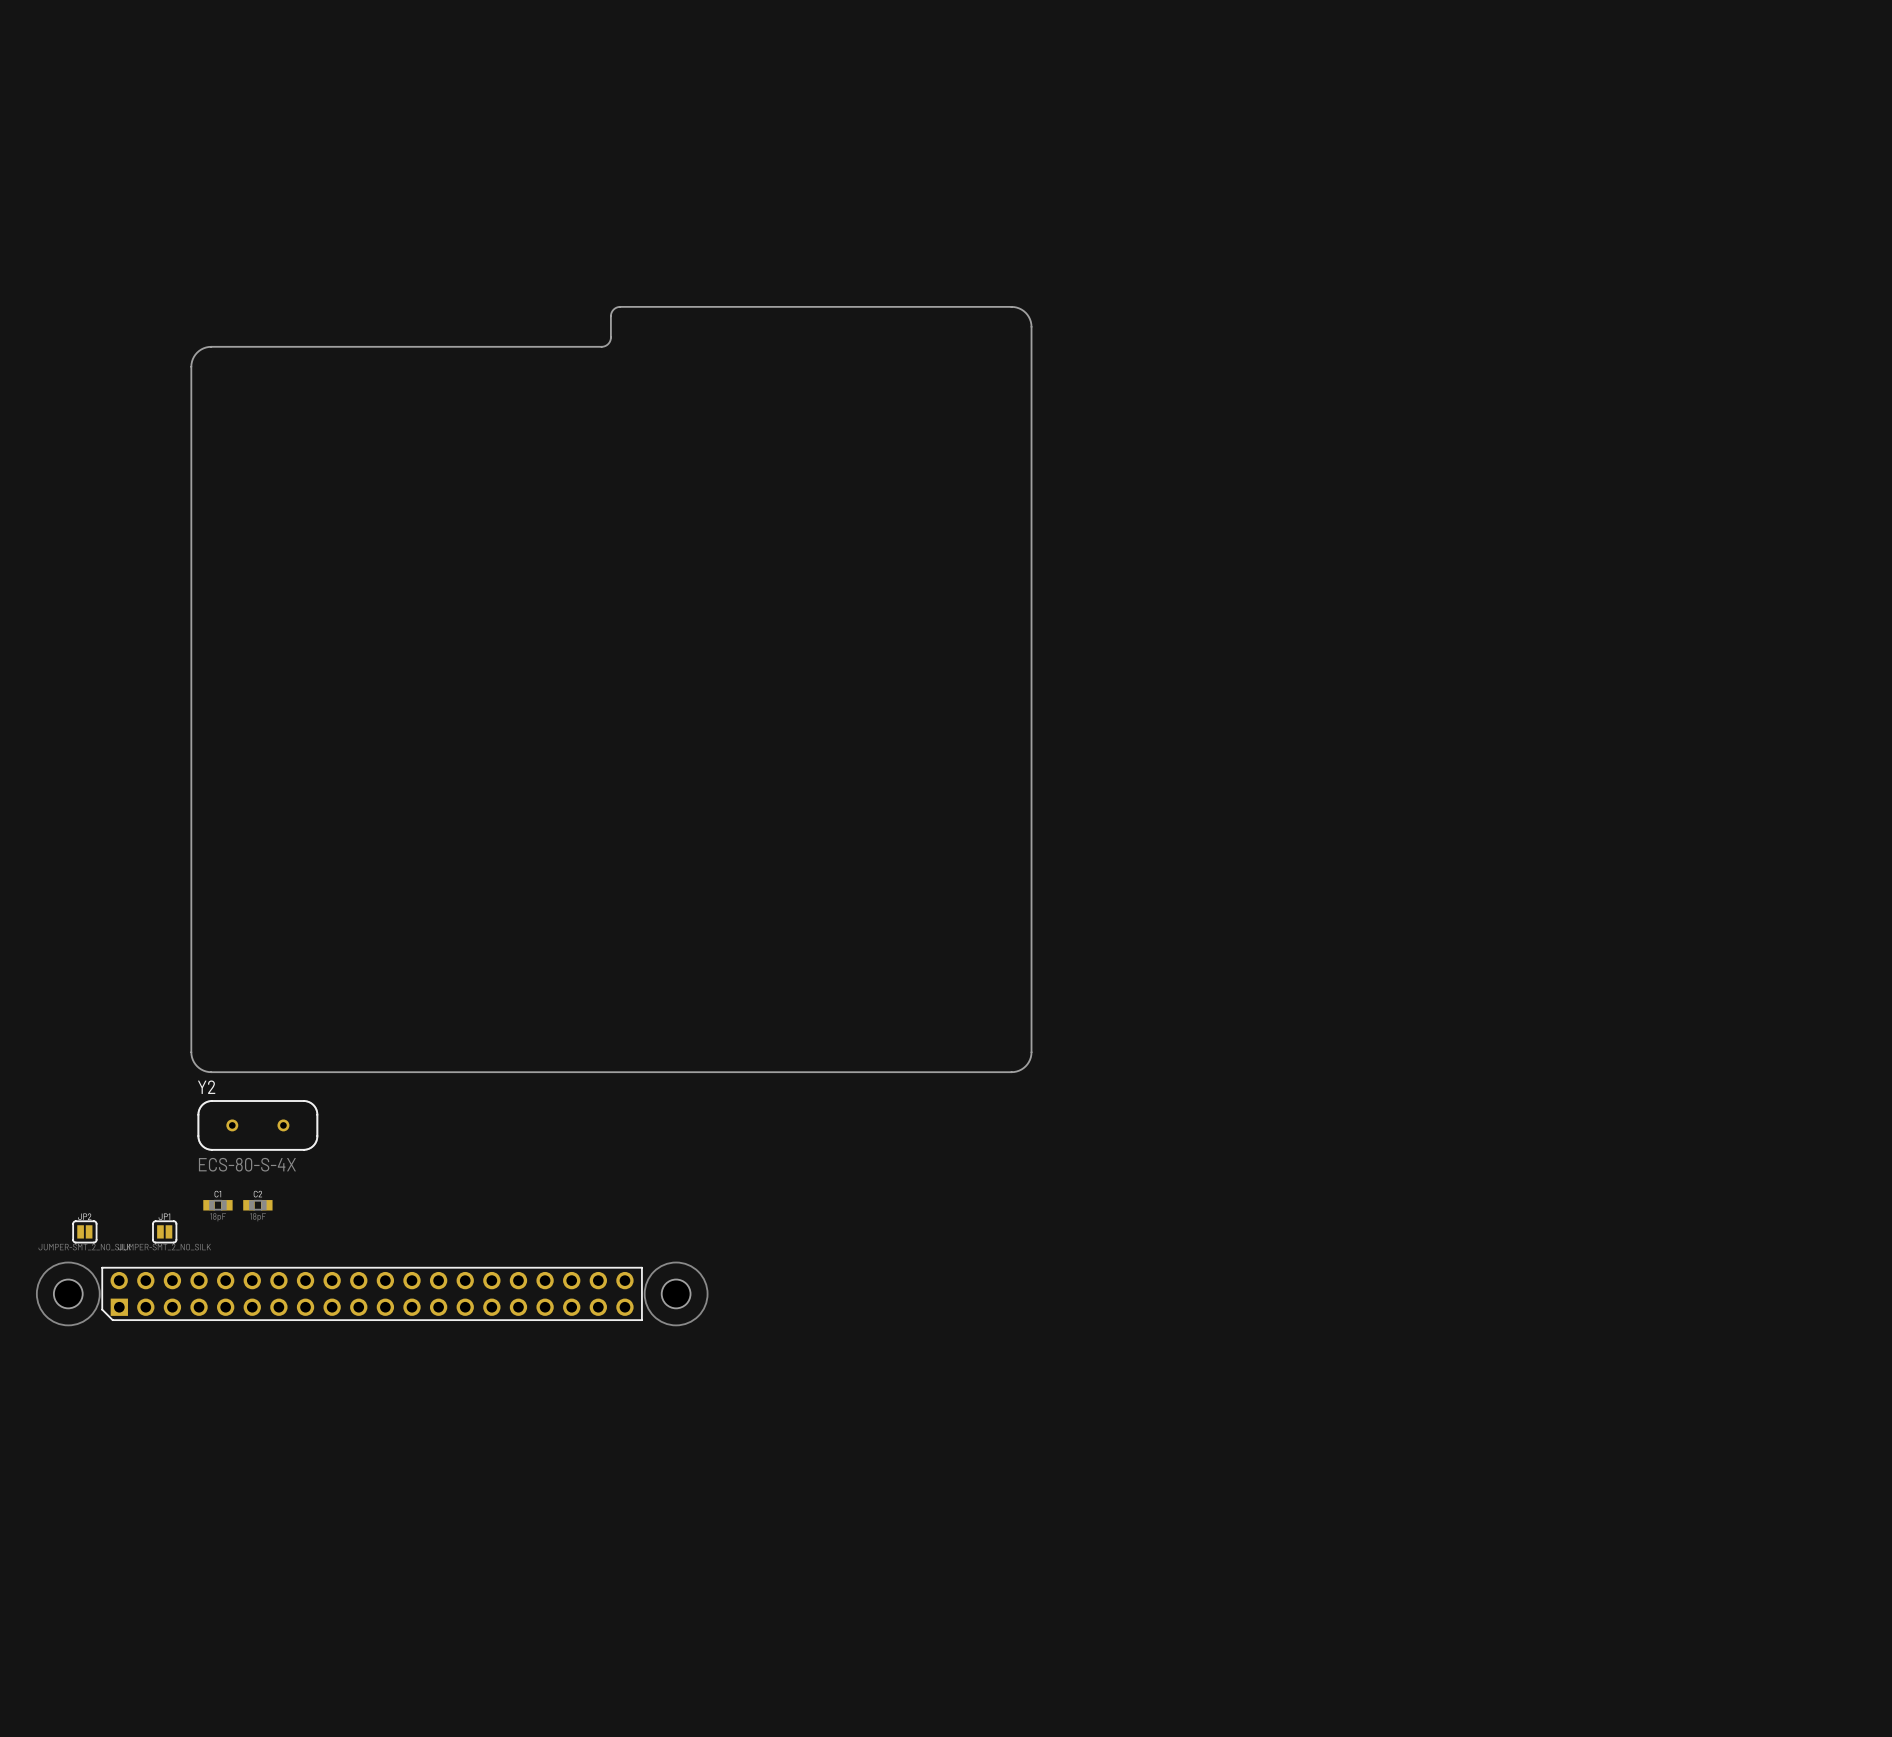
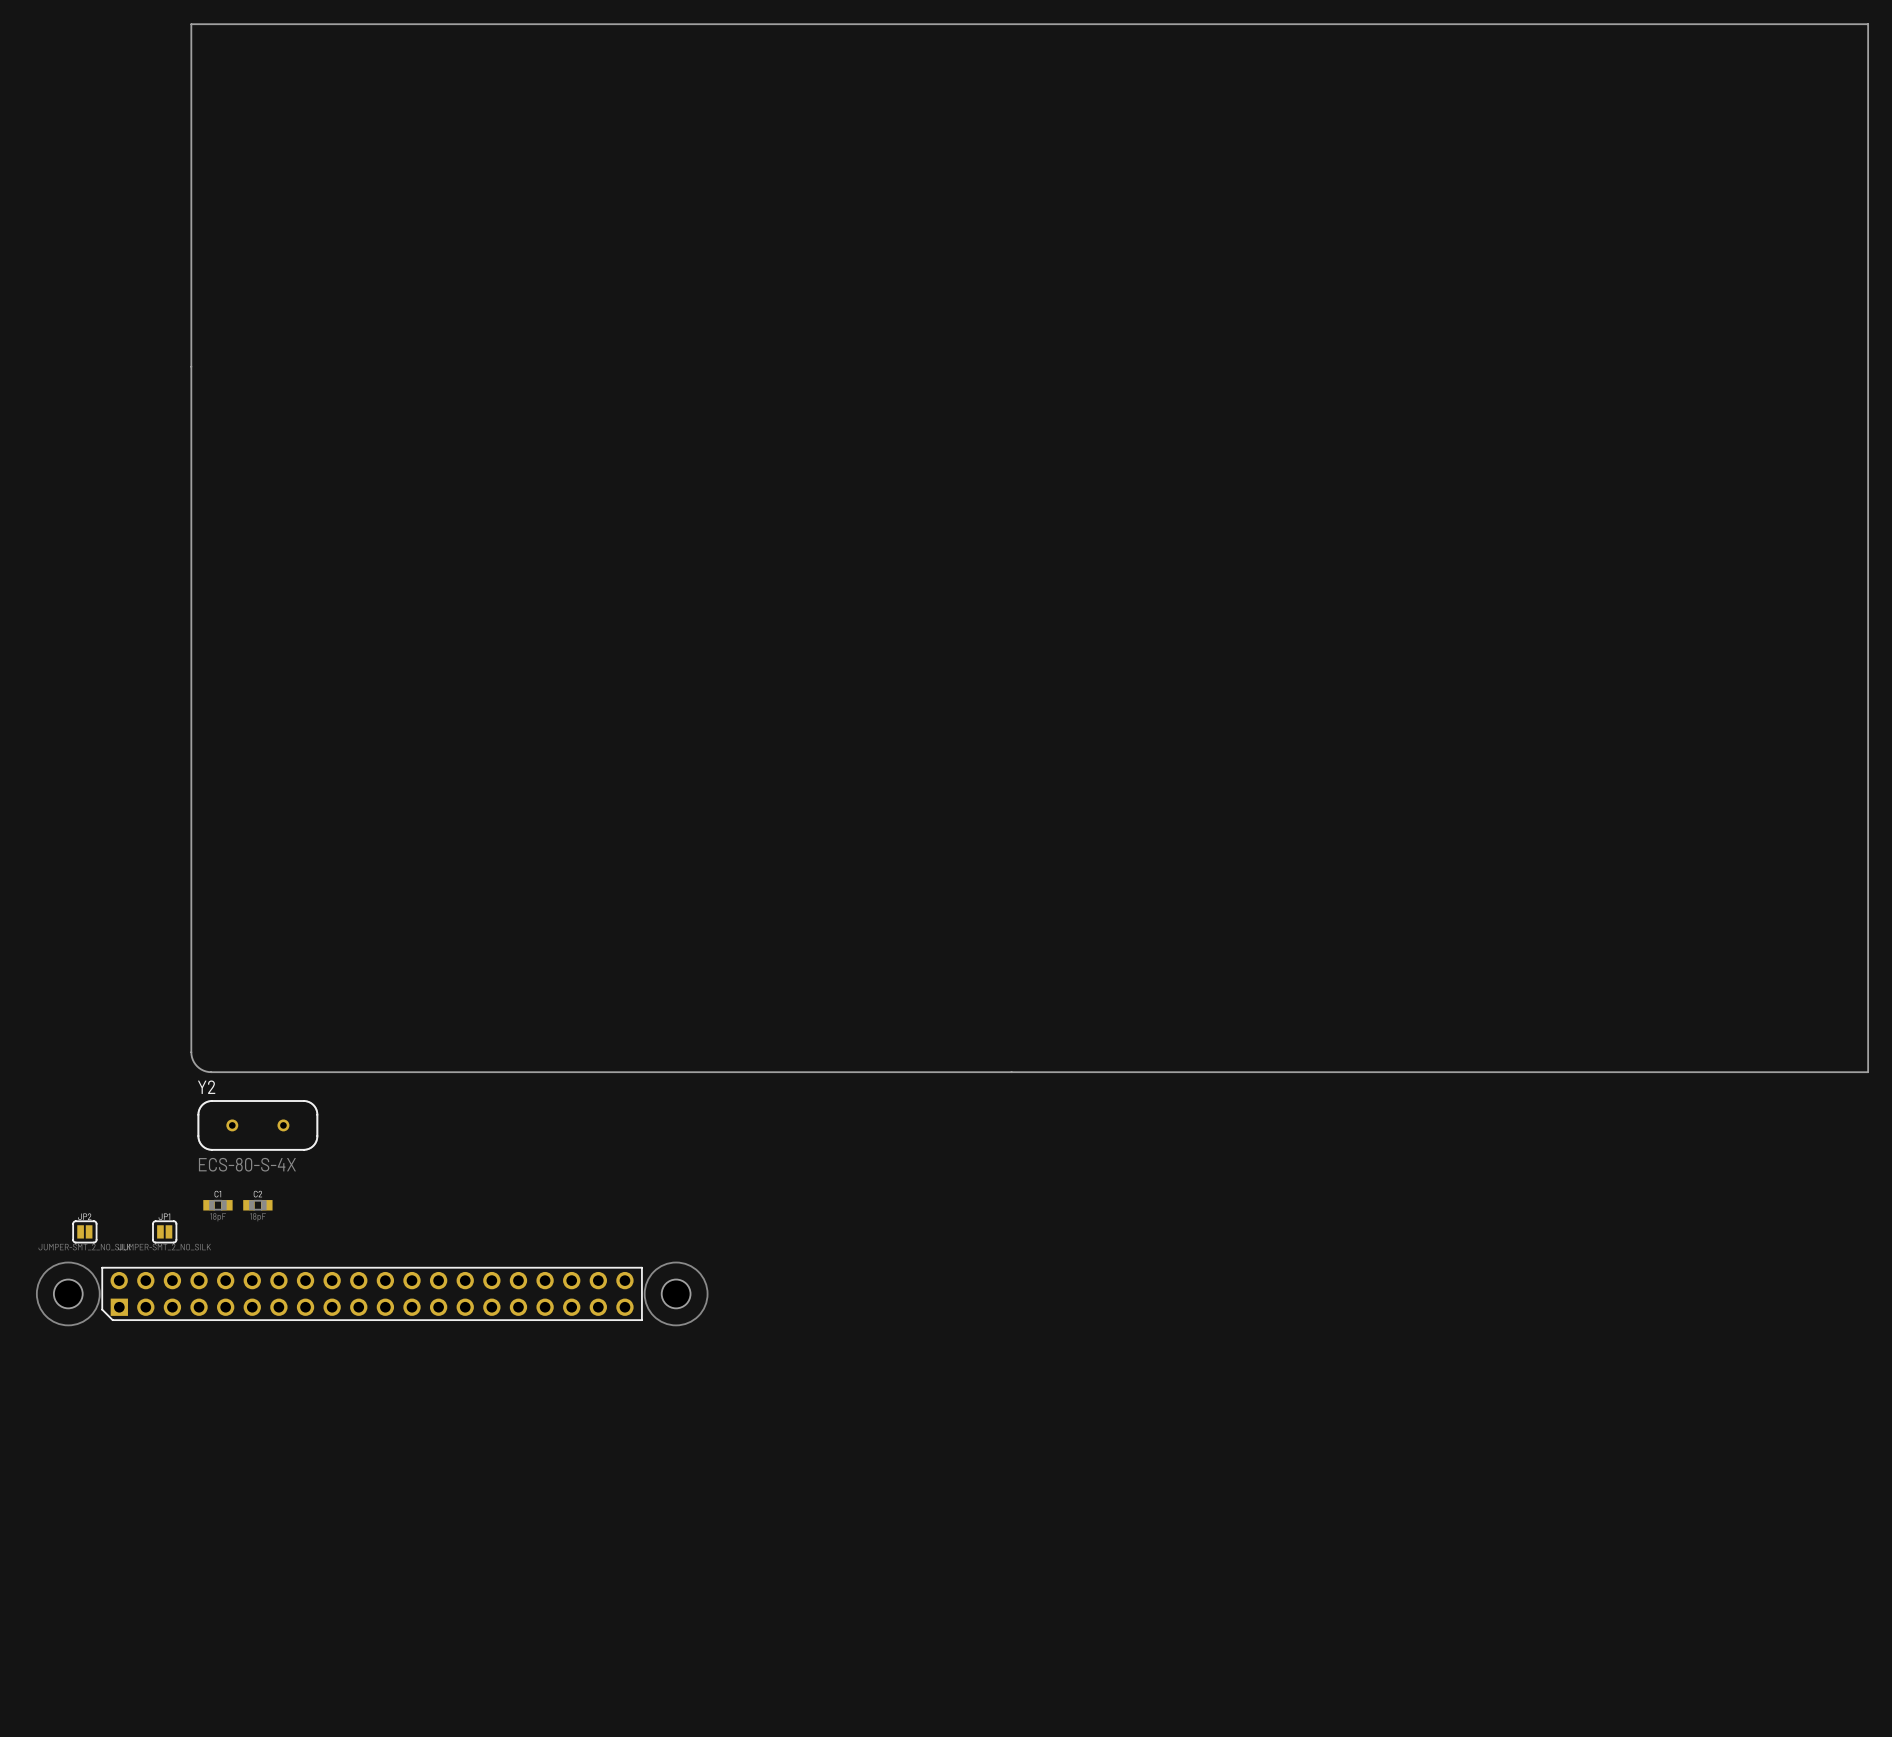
board edge: (191, 366) (192, 359) (197, 352) (203, 348) (211, 346) (602, 346) (607, 344) (610, 339) (611, 312) (619, 306) (1011, 306) (1023, 311) (1028, 316) (1031, 326) (1031, 1052) (1029, 1059) (1025, 1066) (1019, 1070) (1011, 1072) -> (191, 366) (191, 24) (1868, 24) (1868, 1072) (1011, 1072)

